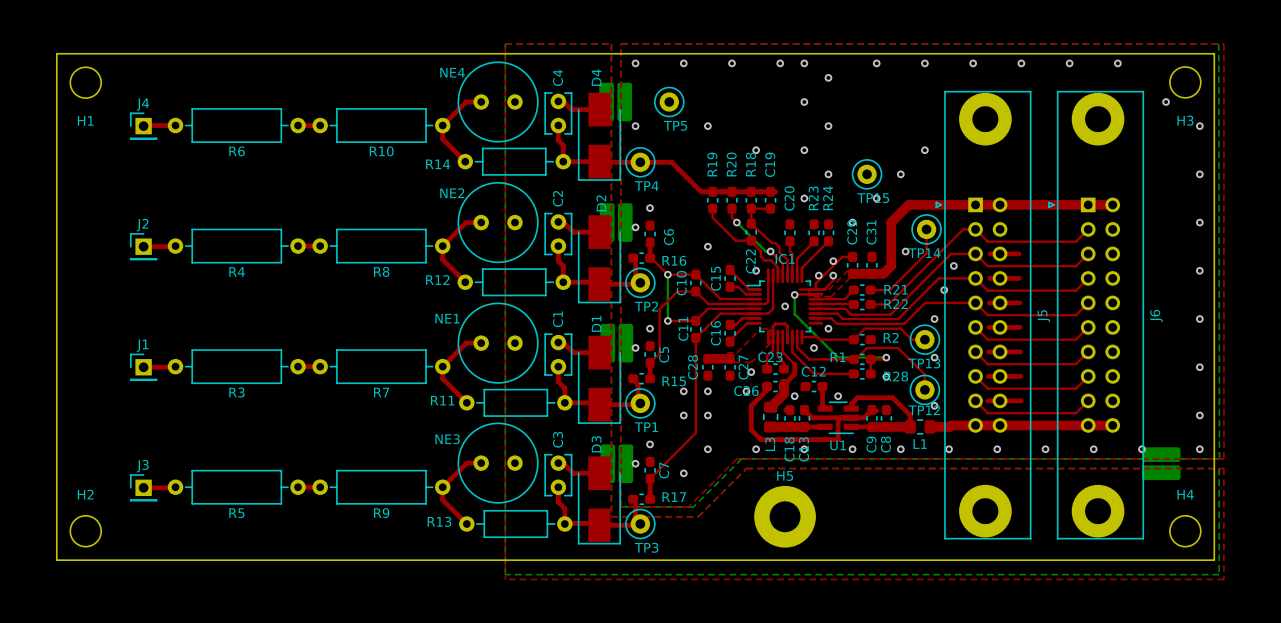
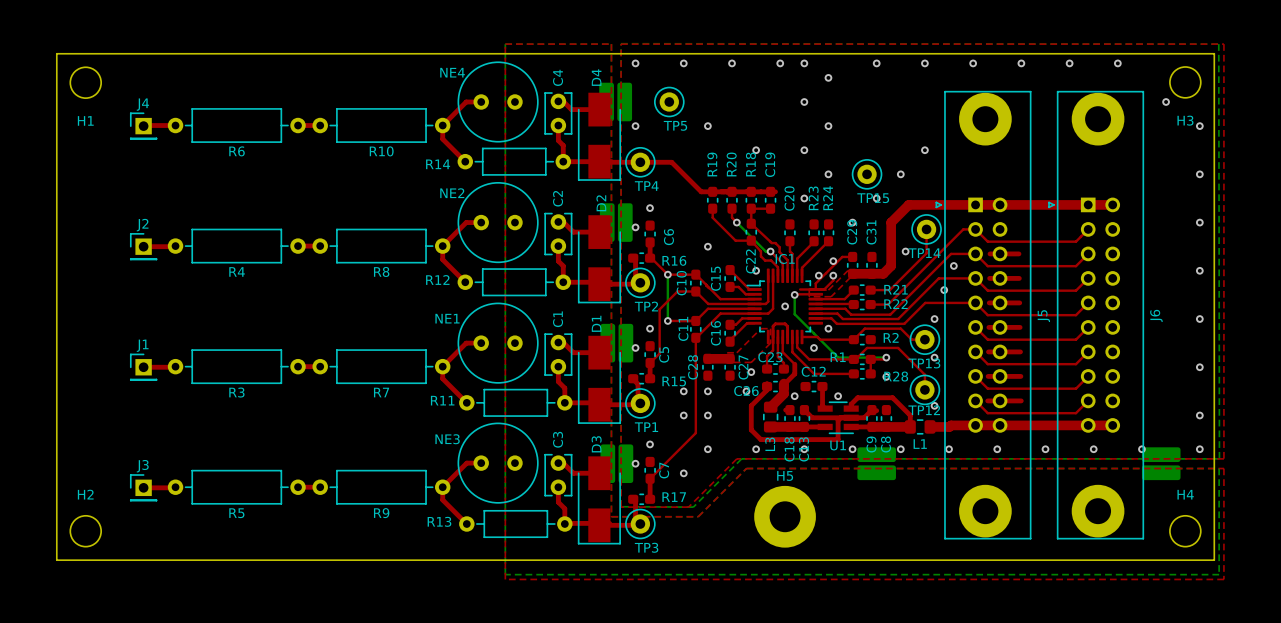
part: none -> (876, 463)

